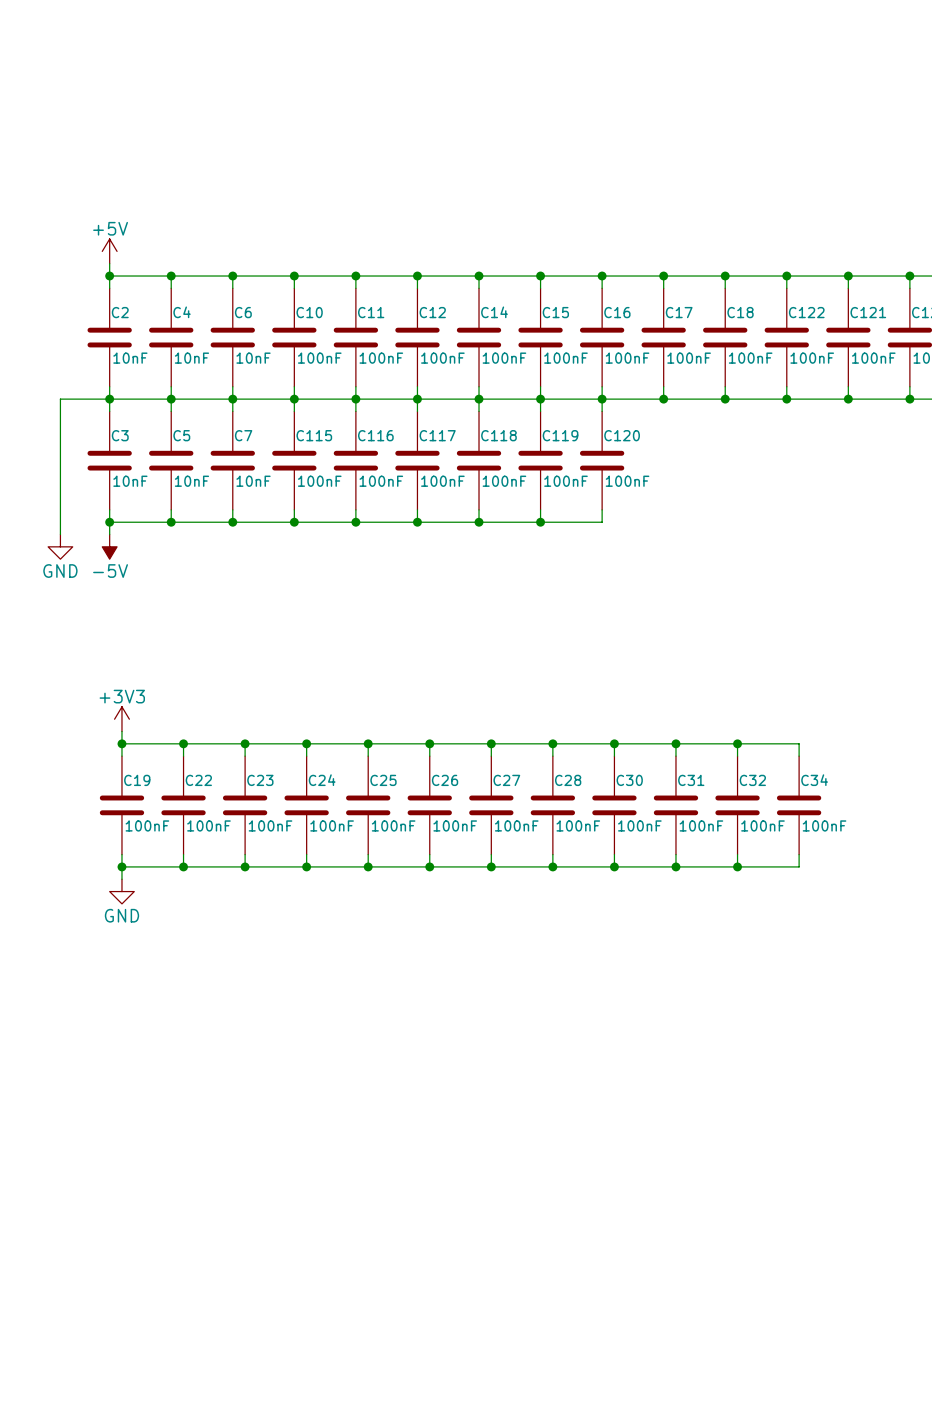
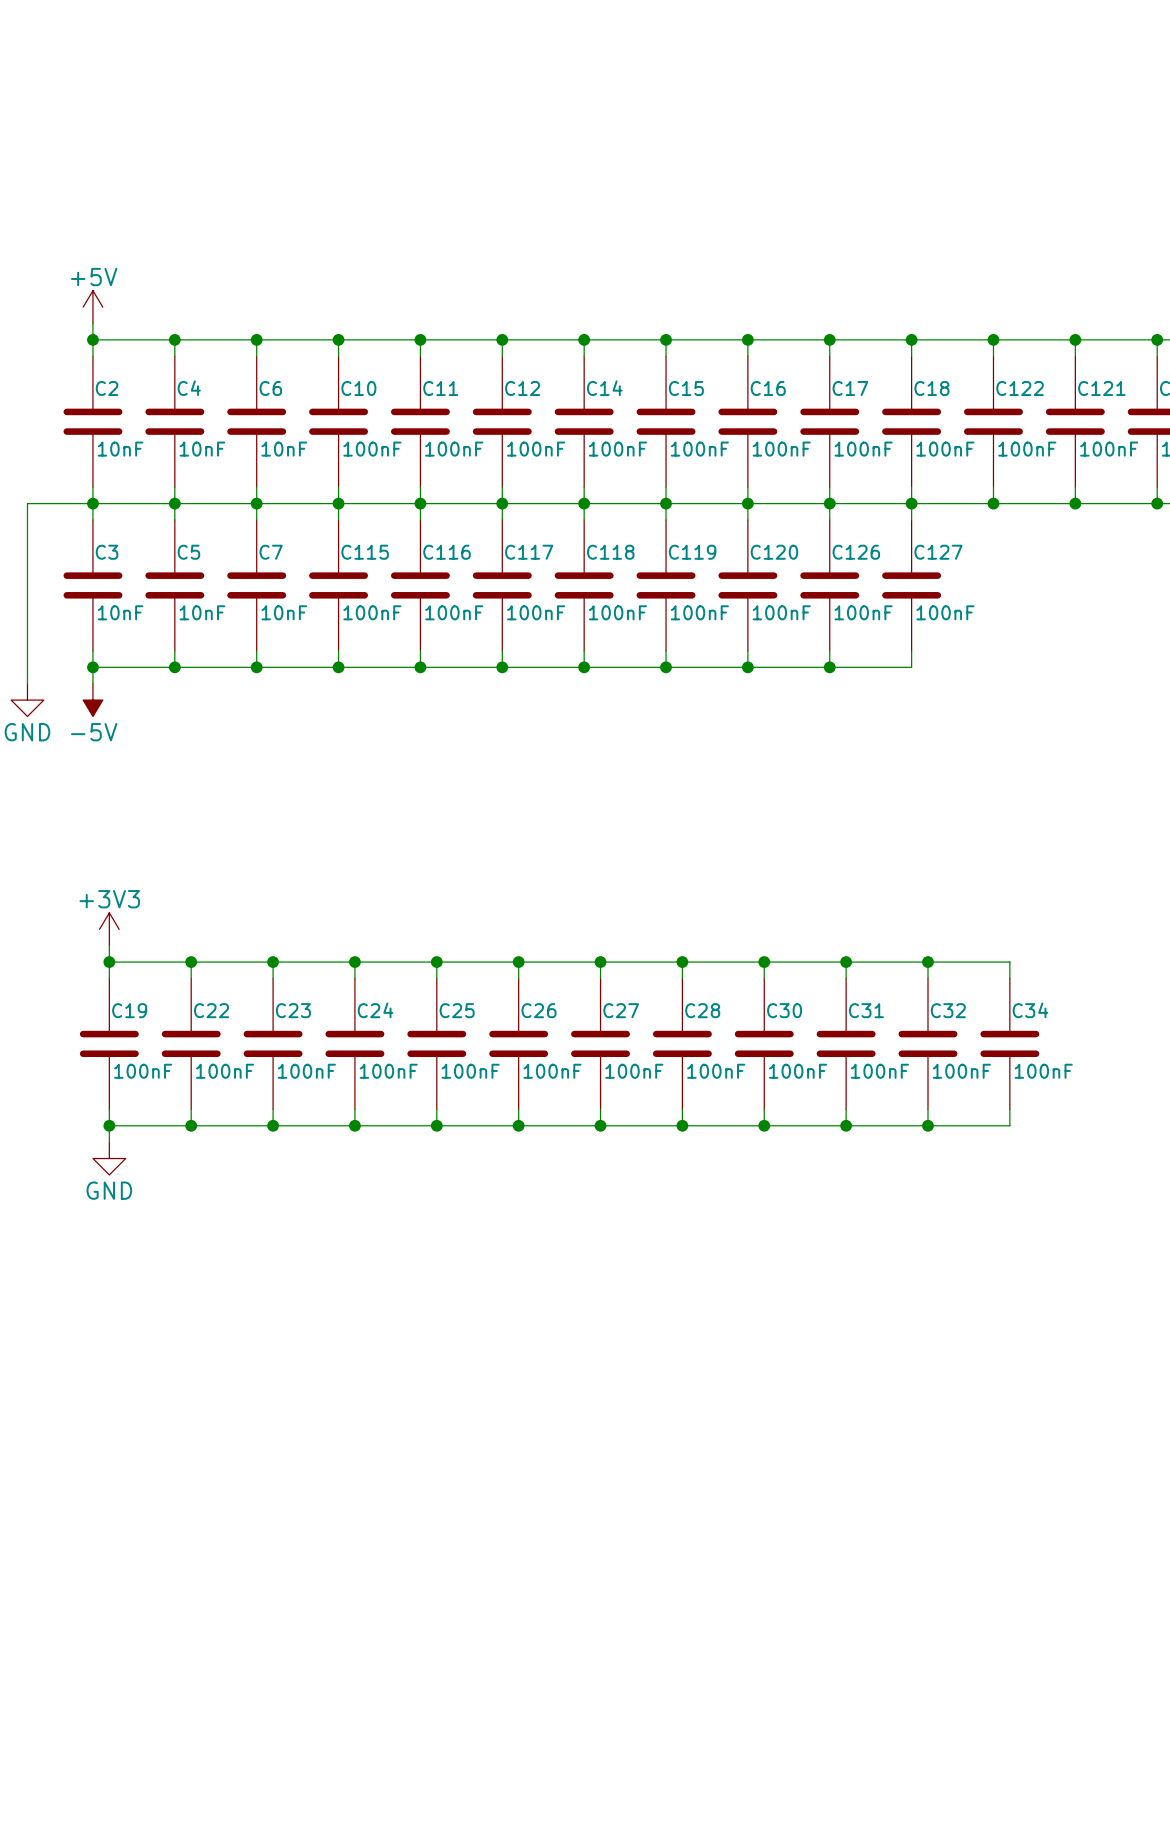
wire: none -> (829, 503) (829, 519)
wire: none -> (911, 503) (911, 519)
C126: none -> 100nF (829, 585)
C127: none -> 100nF (911, 585)
wire: none -> (829, 650) (829, 667)
wire: none -> (911, 650) (911, 667) (747, 667)
junction: none -> (747, 667)
junction: none -> (829, 667)

